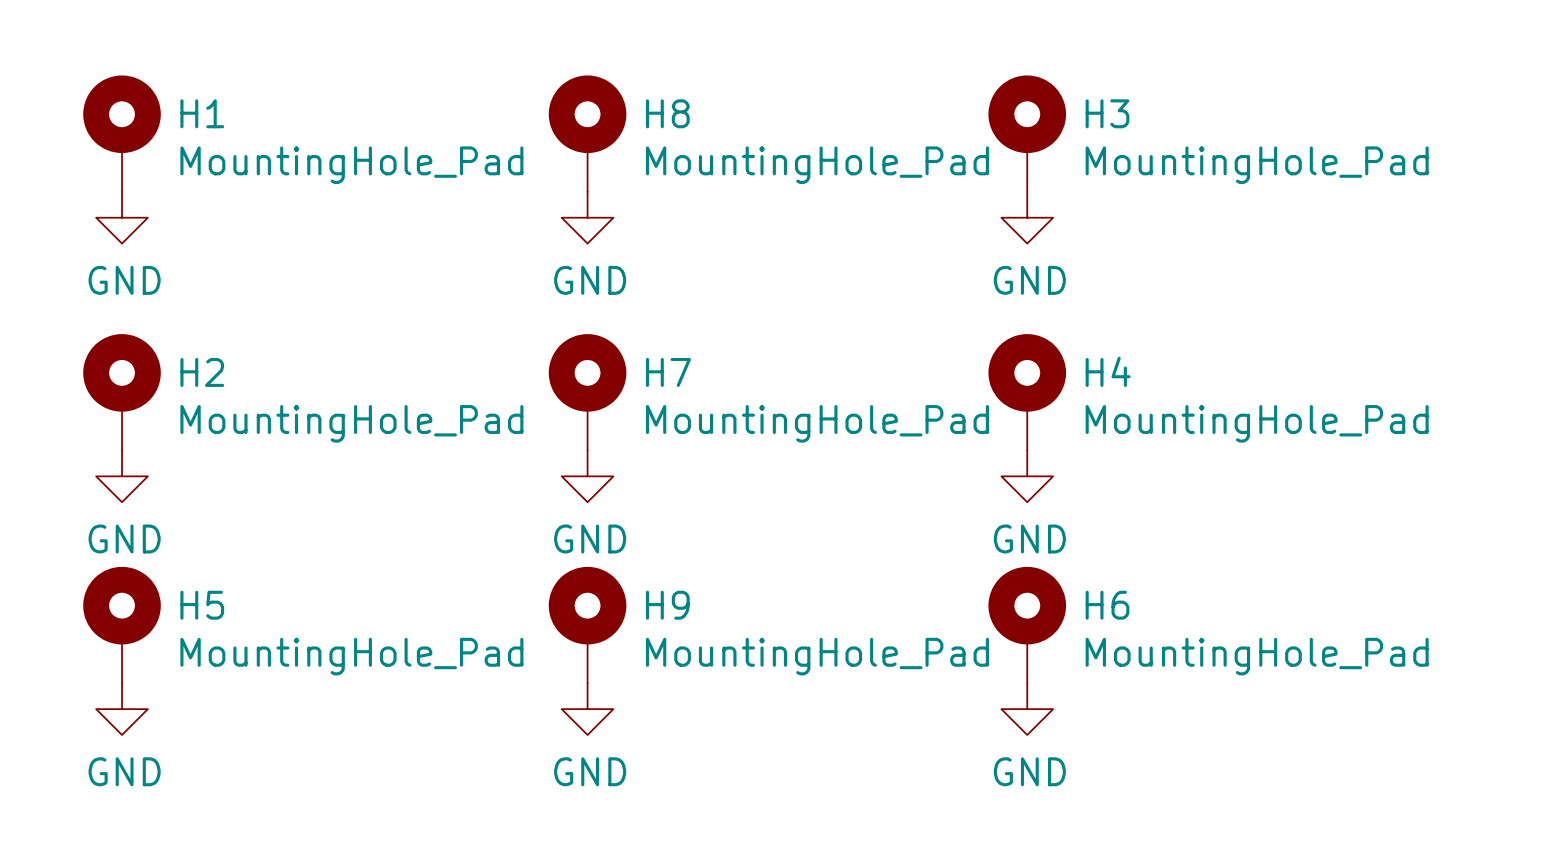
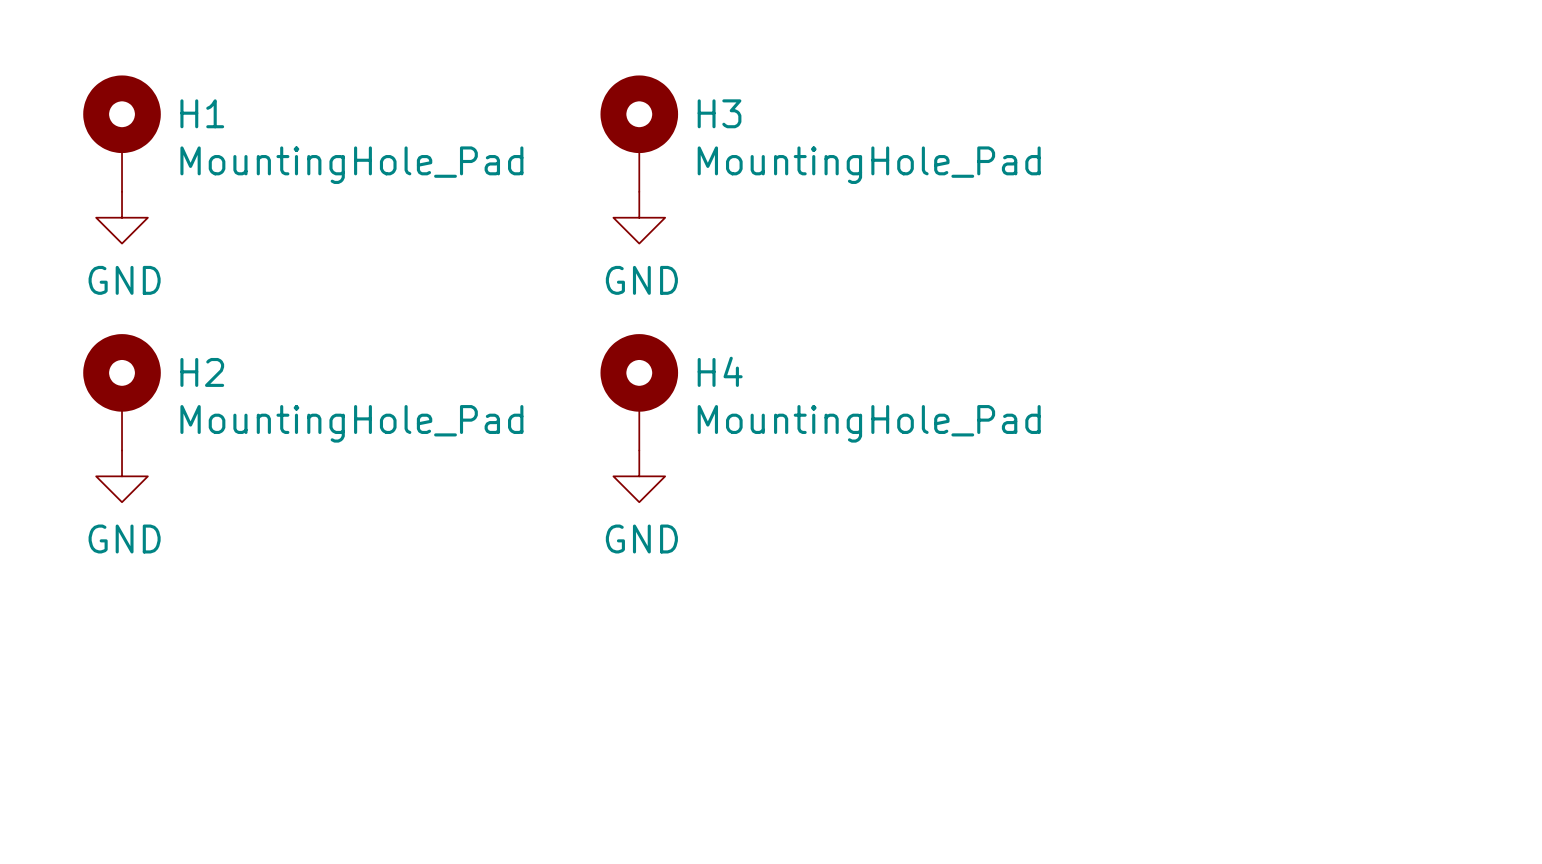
H8: MountingHole_Pad (587, 133) -> none
H3 position: (1027, 133) -> (639, 133)
power symbol position: GND (587, 217) -> GND (639, 217)
power symbol: GND (1027, 217) -> none
H7: MountingHole_Pad (587, 392) -> none
H4 position: (1027, 392) -> (639, 392)
power symbol position: GND (587, 476) -> GND (639, 476)
power symbol: GND (1027, 476) -> none
H5: MountingHole_Pad (122, 625) -> none
H9: MountingHole_Pad (587, 625) -> none
H6: MountingHole_Pad (1027, 625) -> none
power symbol: GND (122, 709) -> none
power symbol: GND (587, 709) -> none
power symbol: GND (1027, 709) -> none

